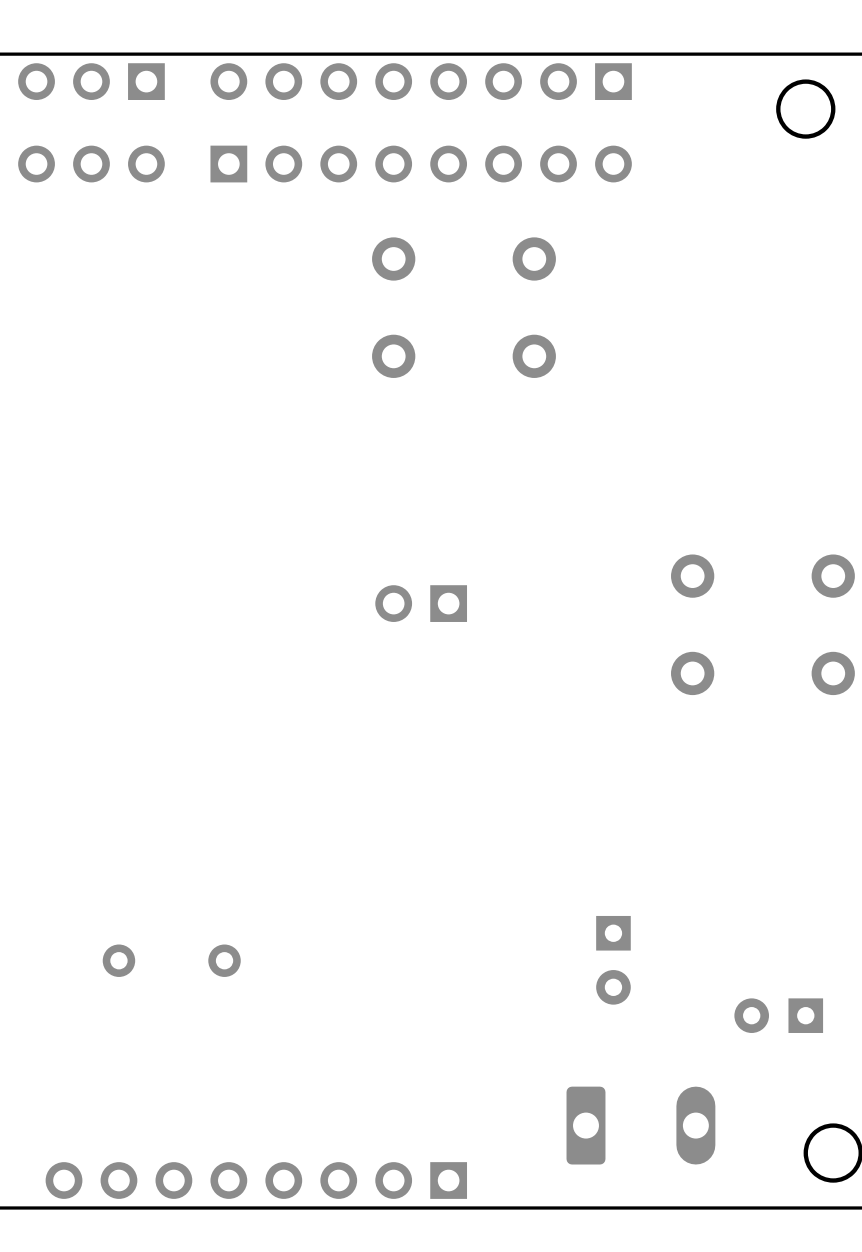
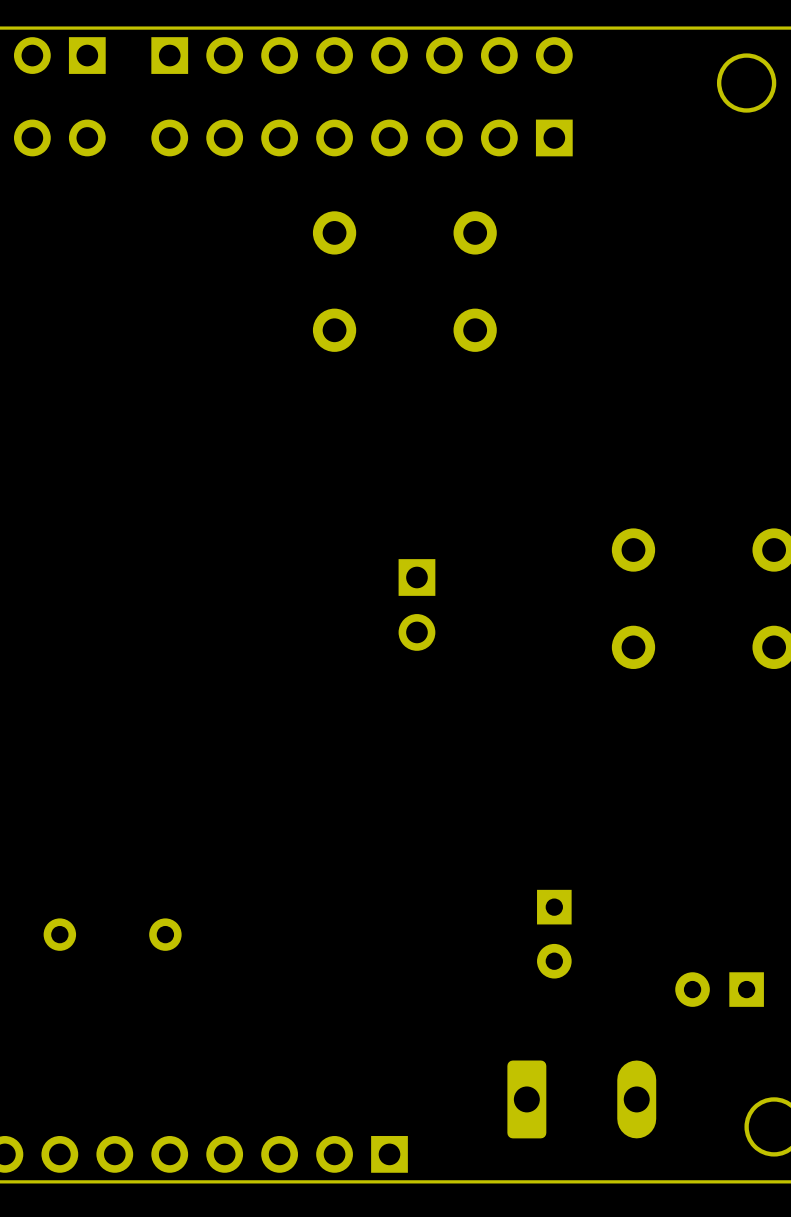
part rotation: 0° (421, 81) -> 180° (362, 55)
part rotation: 0° (421, 164) -> 180° (362, 137)
part rotation: 0° (421, 603) -> 90° counterclockwise (416, 604)
part position: (421, 603) -> (416, 604)

